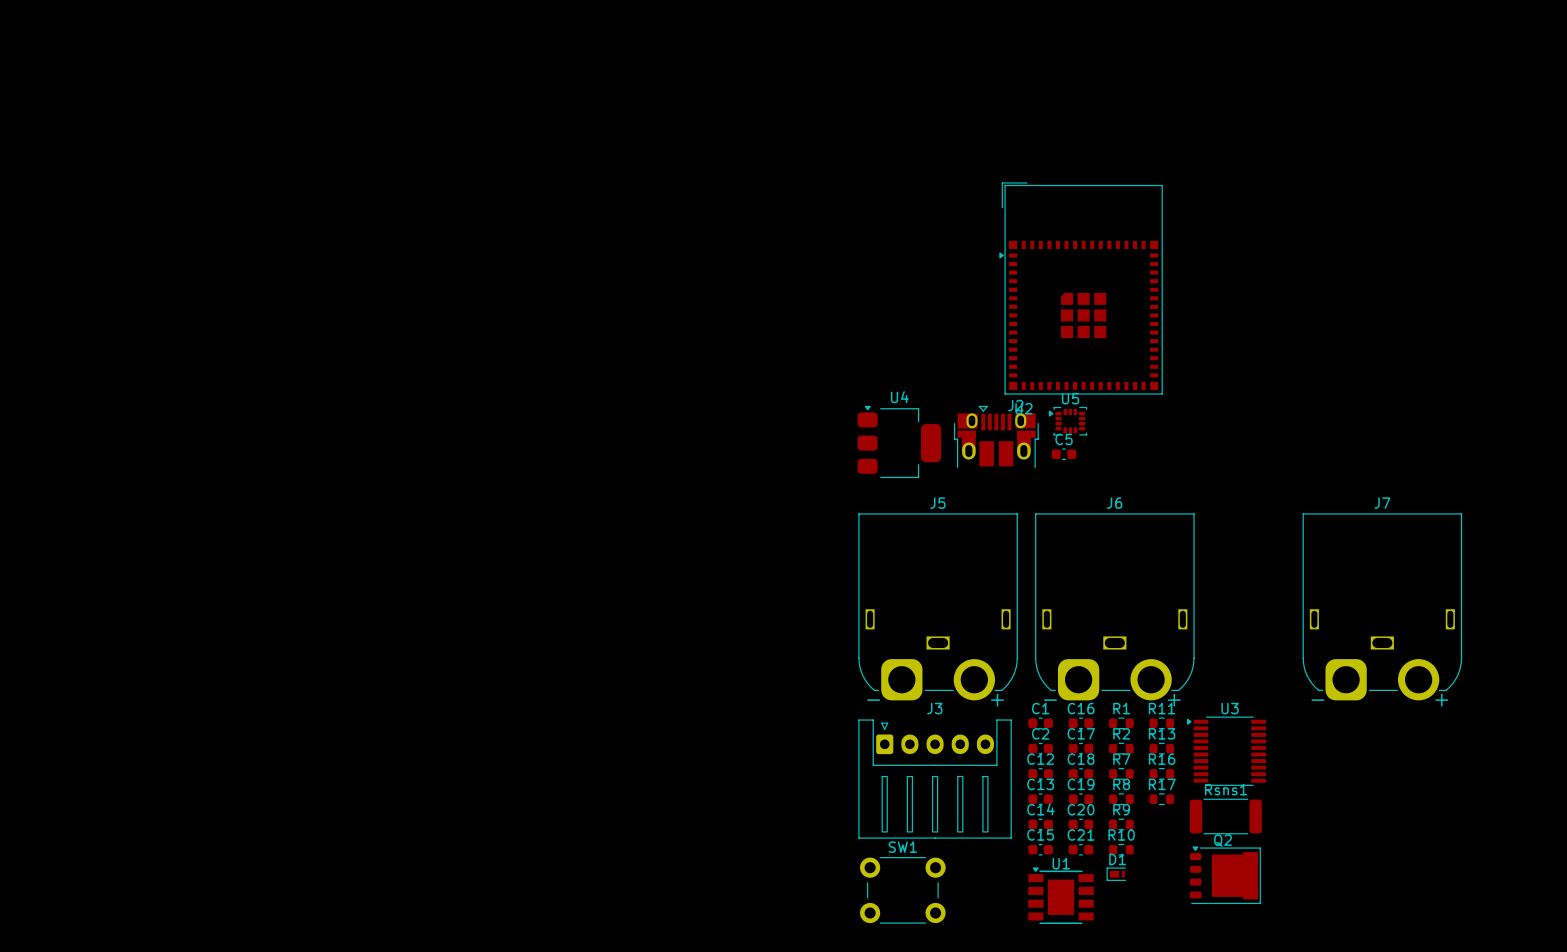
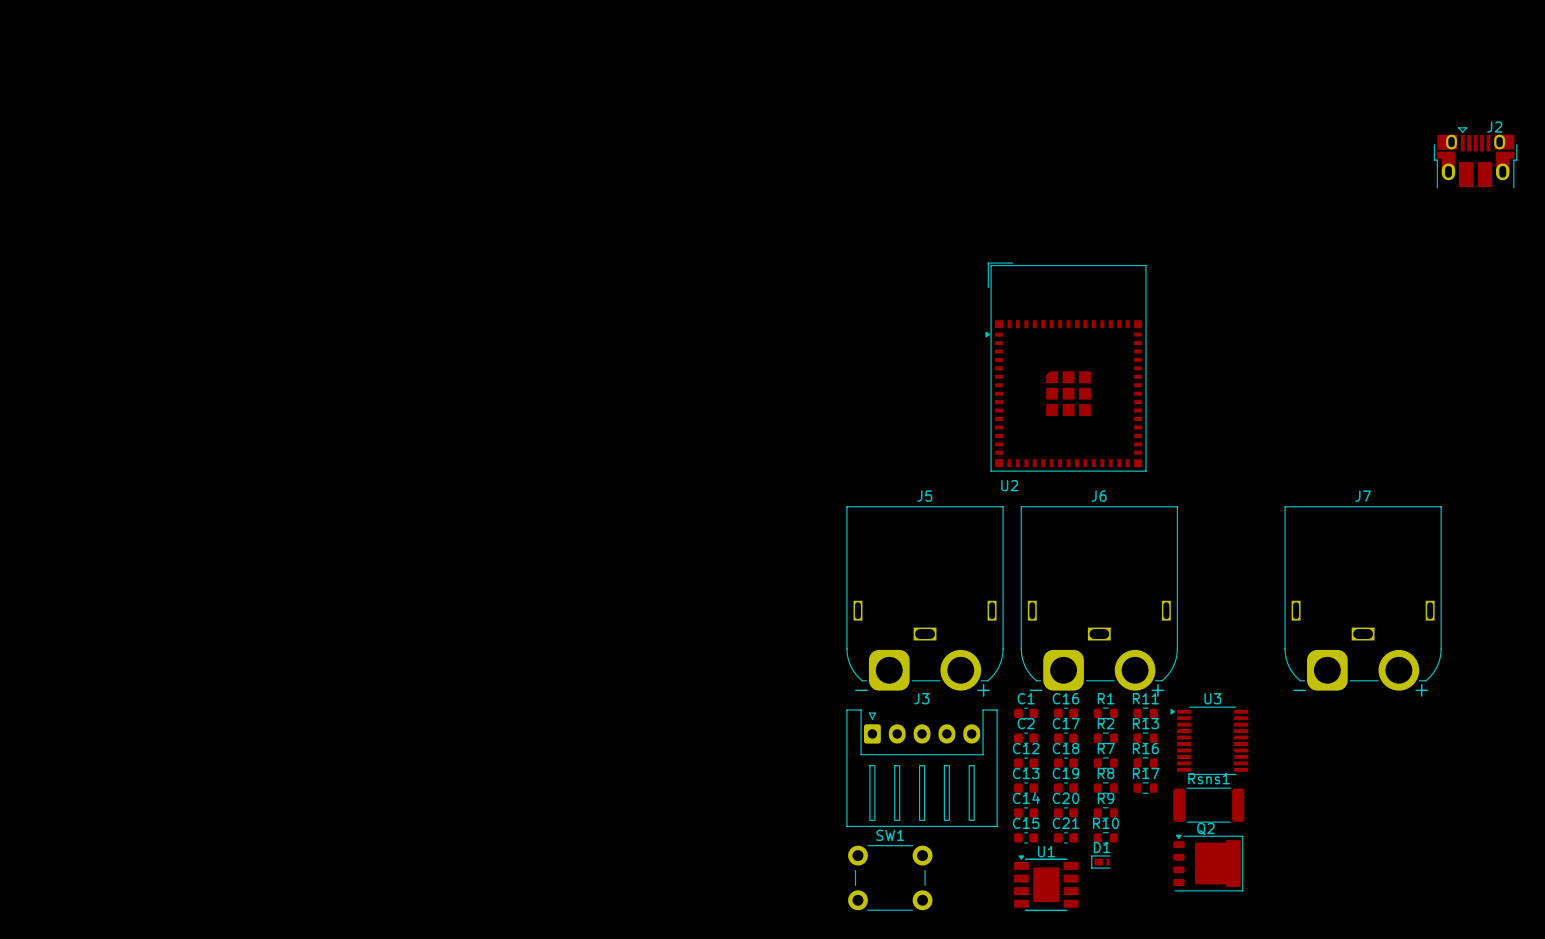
U2 position: (1081, 288) -> (1066, 367)
U5: (1067, 421) -> none
J2 position: (996, 436) -> (1475, 157)
U4: (899, 441) -> none
C5: (1063, 454) -> none

